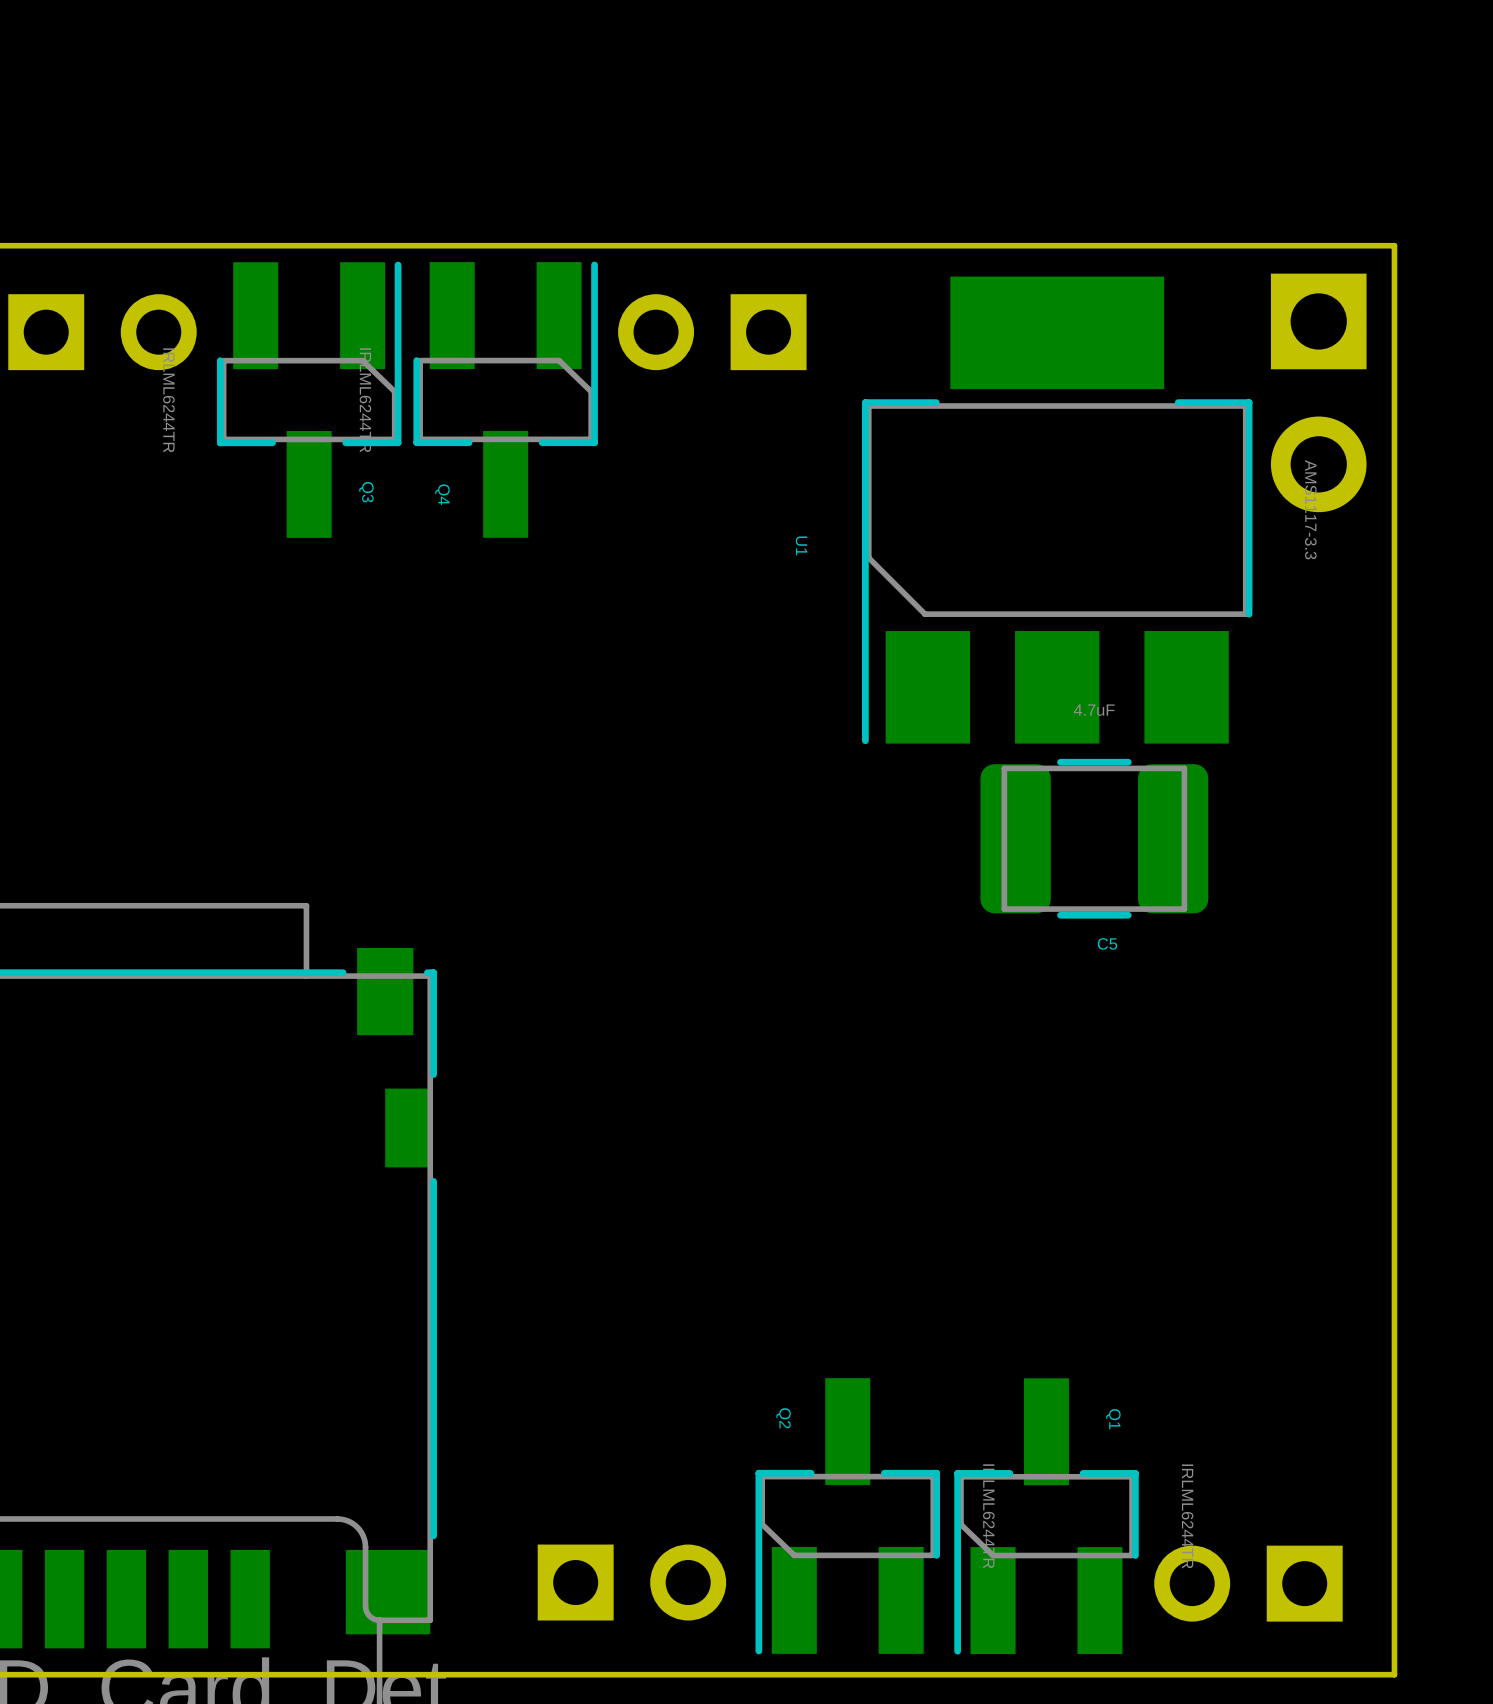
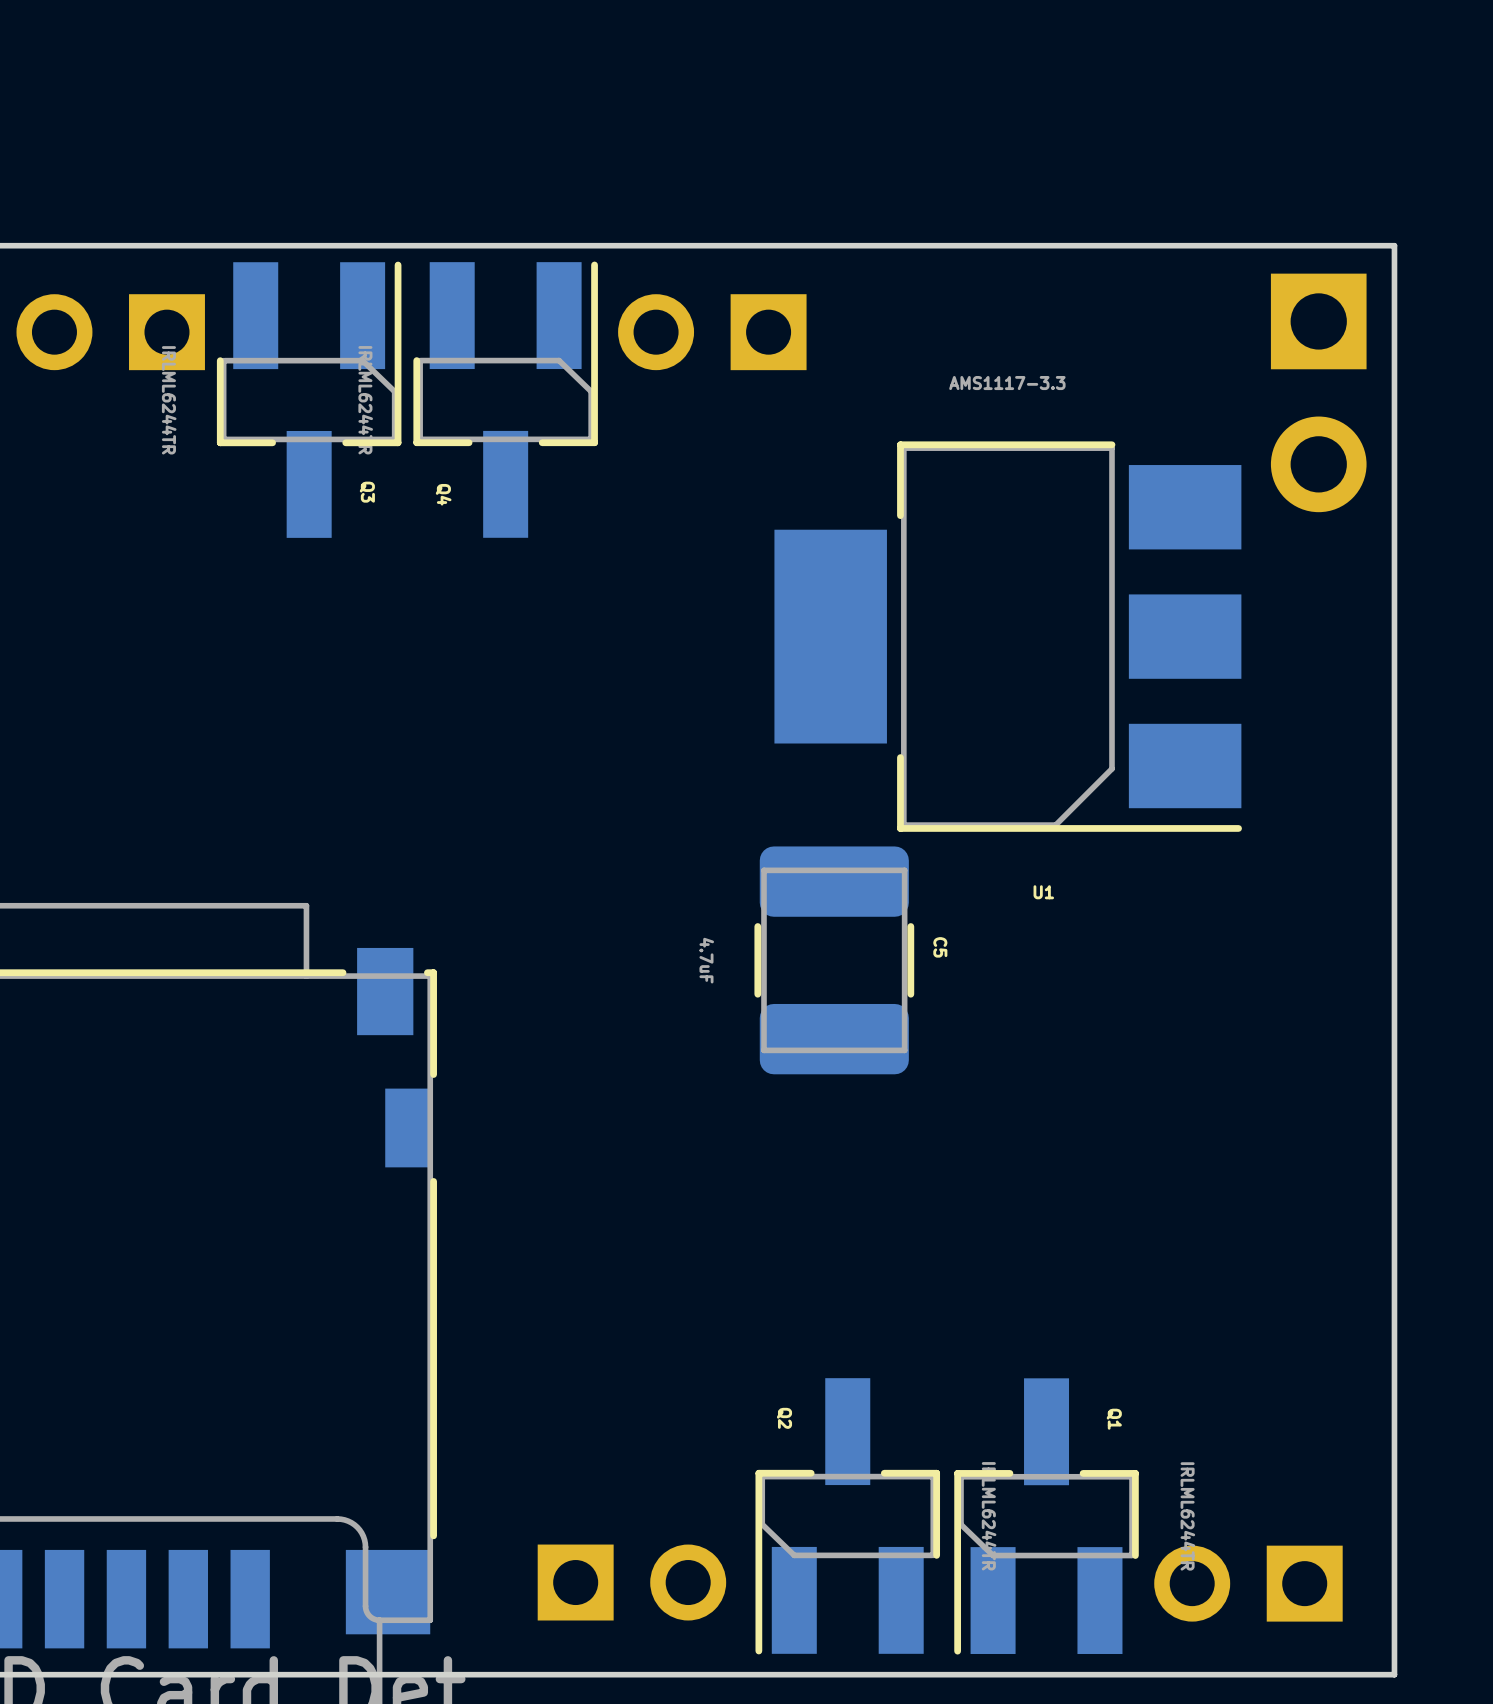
part rotation: 0° (102, 332) -> 180° (110, 332)
U1 rotation: 0° (1057, 510) -> 90° counterclockwise (1008, 636)
C5 value position: 4.7uF (1094, 710) -> 4.7uF (706, 960)
C5 rotation: 0° (1094, 838) -> 90° clockwise (834, 960)
C5 position: (1094, 838) -> (834, 960)
C5 name position: C5 (1107, 943) -> C5 (940, 947)

